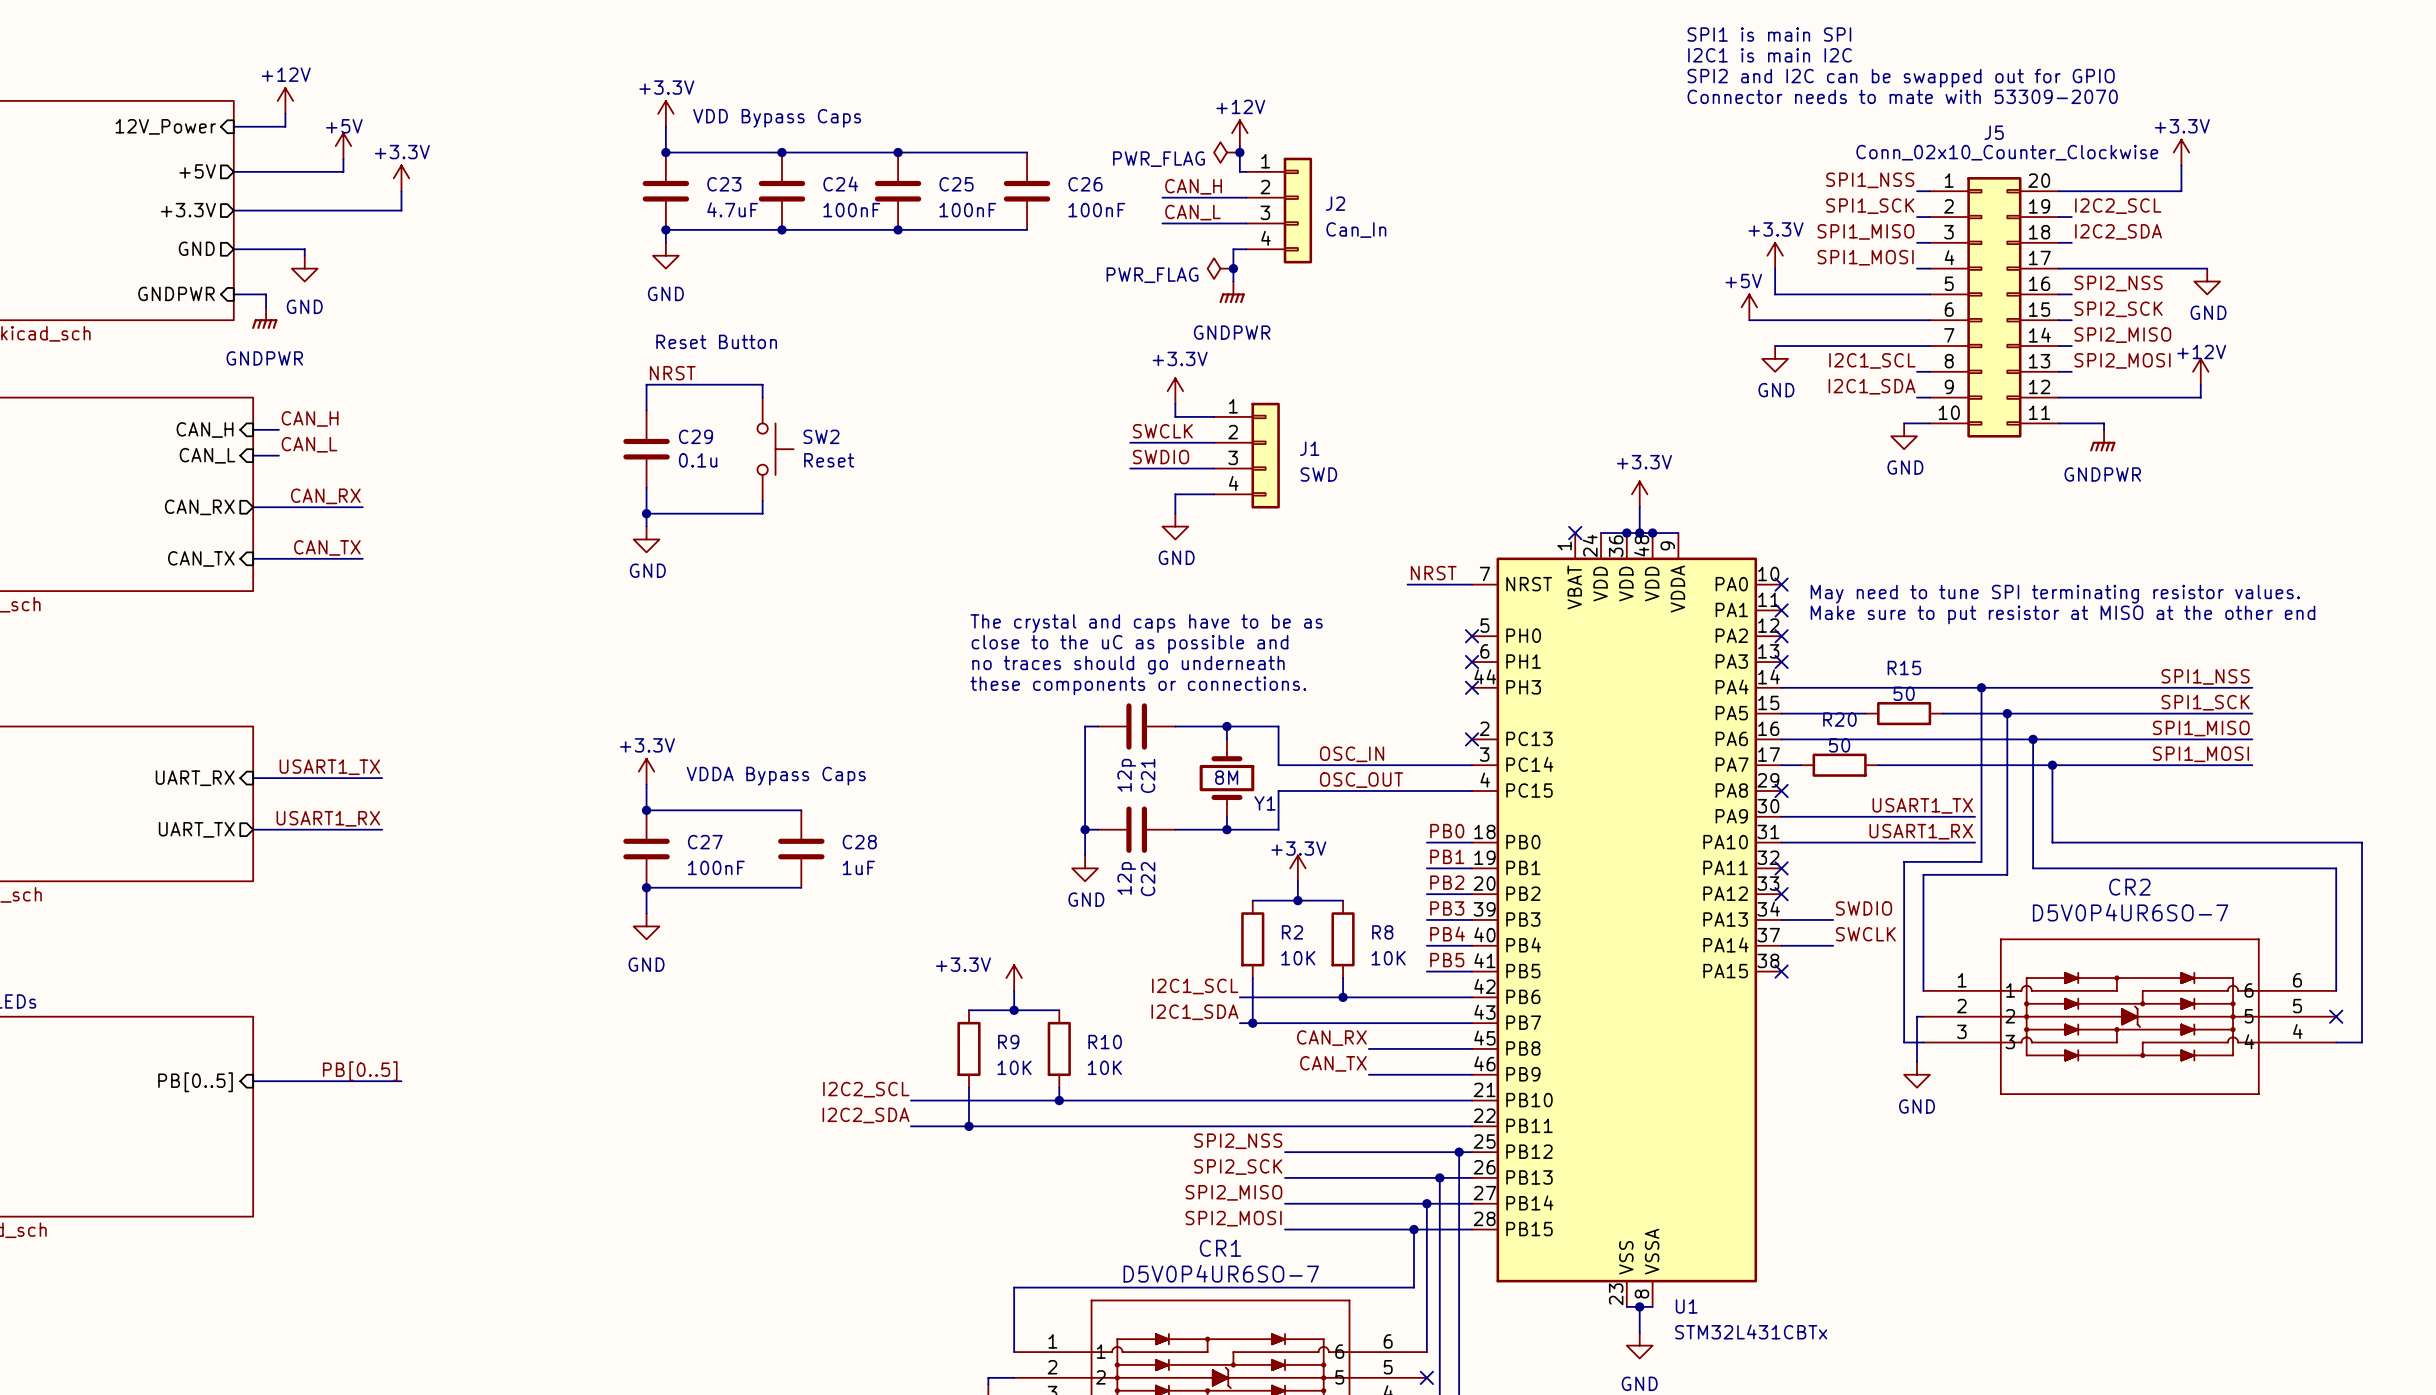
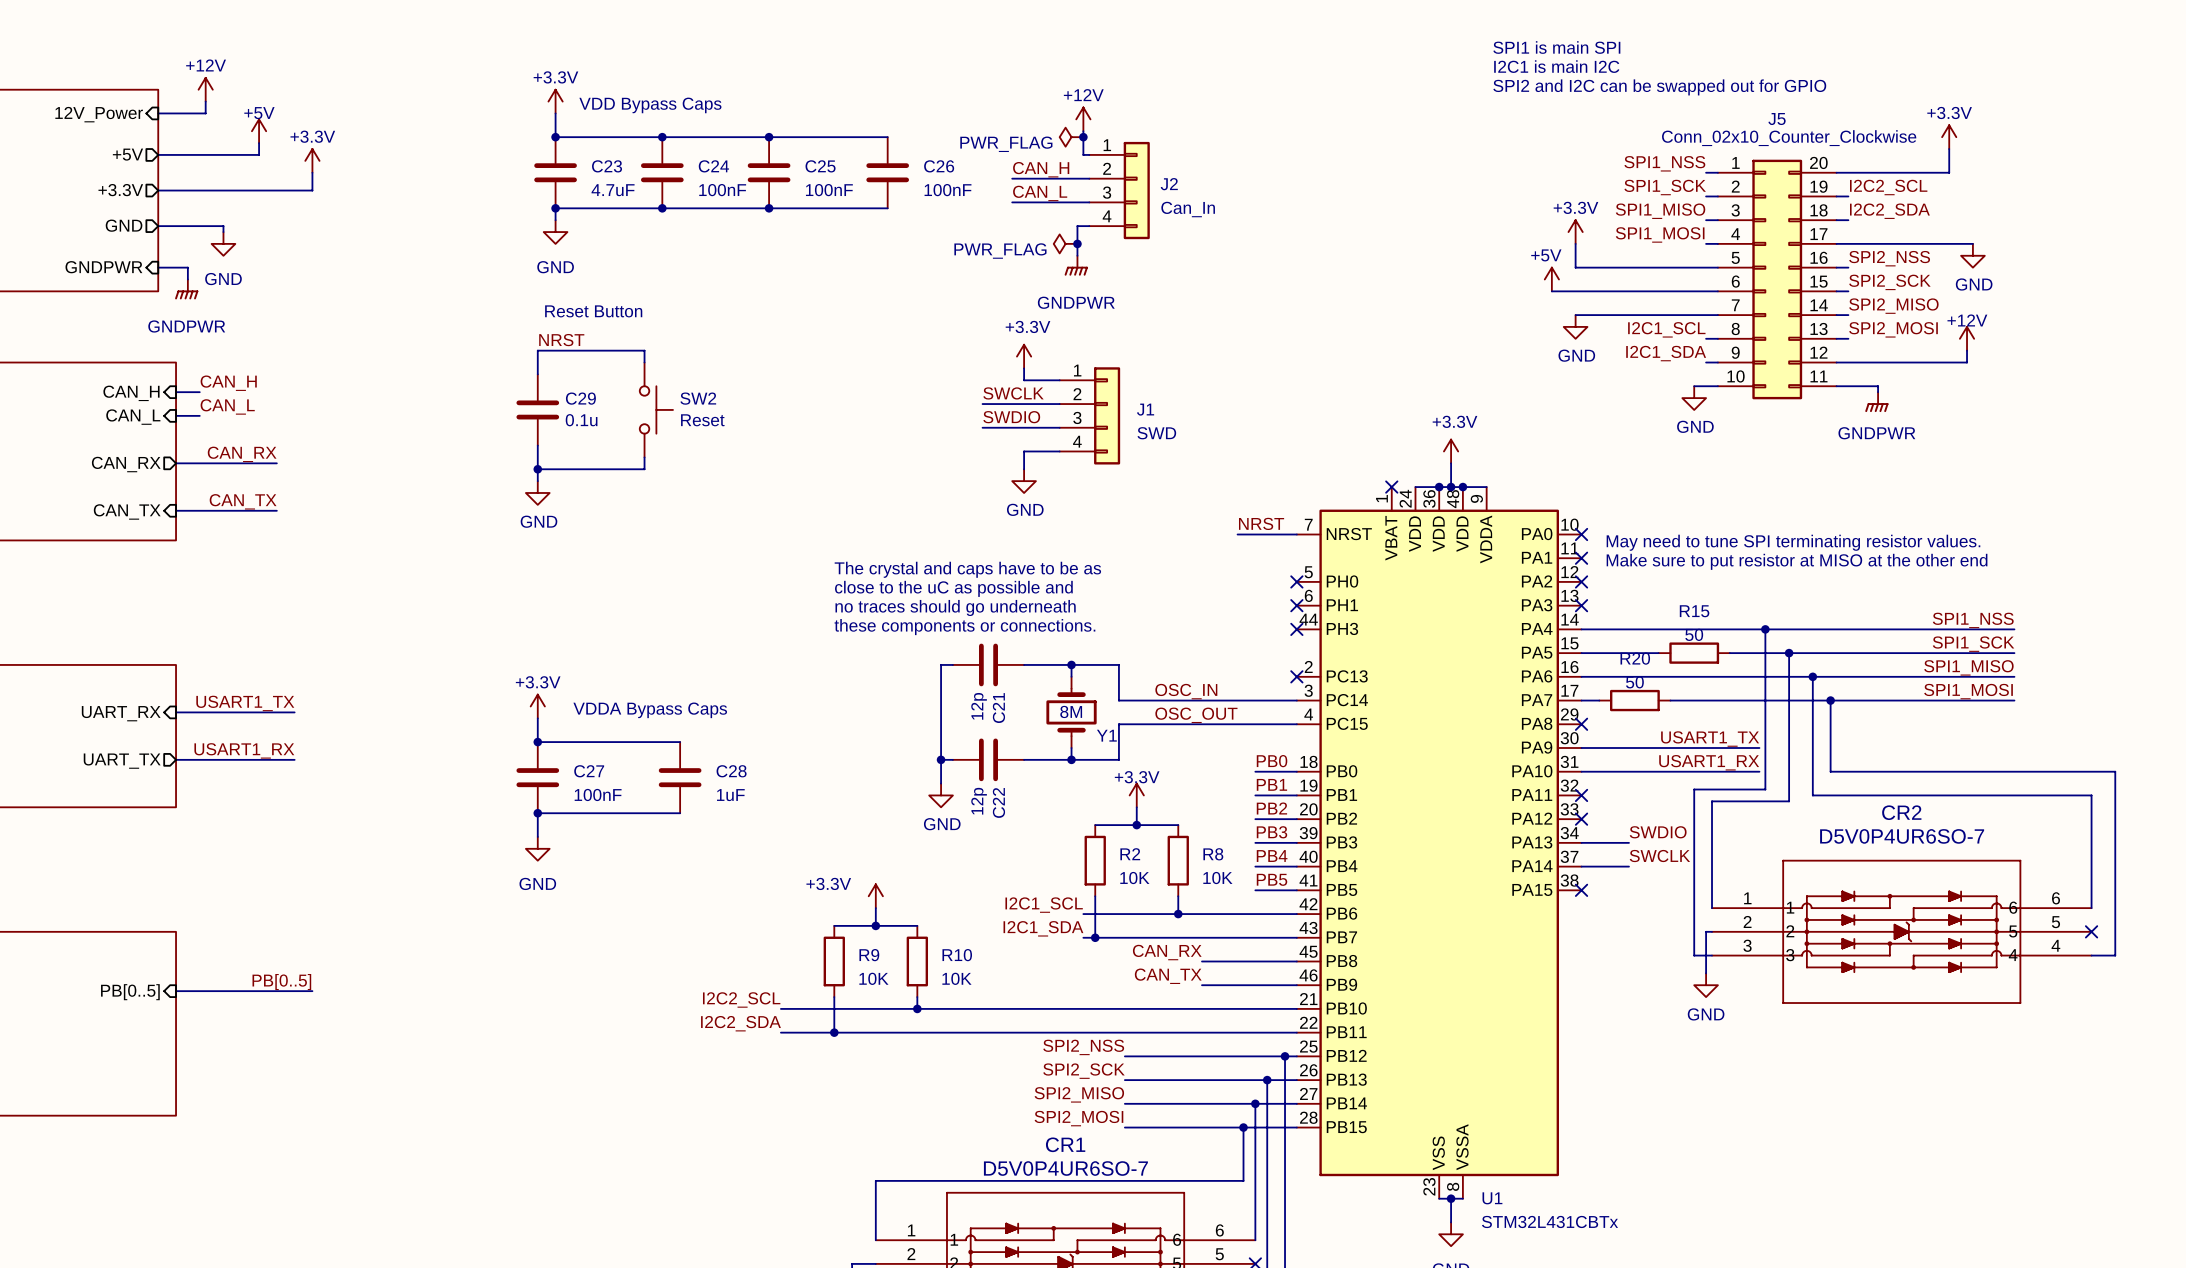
text: SPI1 is main SPI (1769, 34) -> none
text: I2C1 is main I2C (1770, 55) -> SPI1 is main SPI (1556, 47)
text: SPI2 and I2C can be swapped out for GPIO (1901, 78) -> I2C1 is main I2C (1556, 66)
text: Connector needs to mate with 53309-2070 (1902, 96) -> SPI2 and I2C can be swapped out for GPIO (1659, 87)

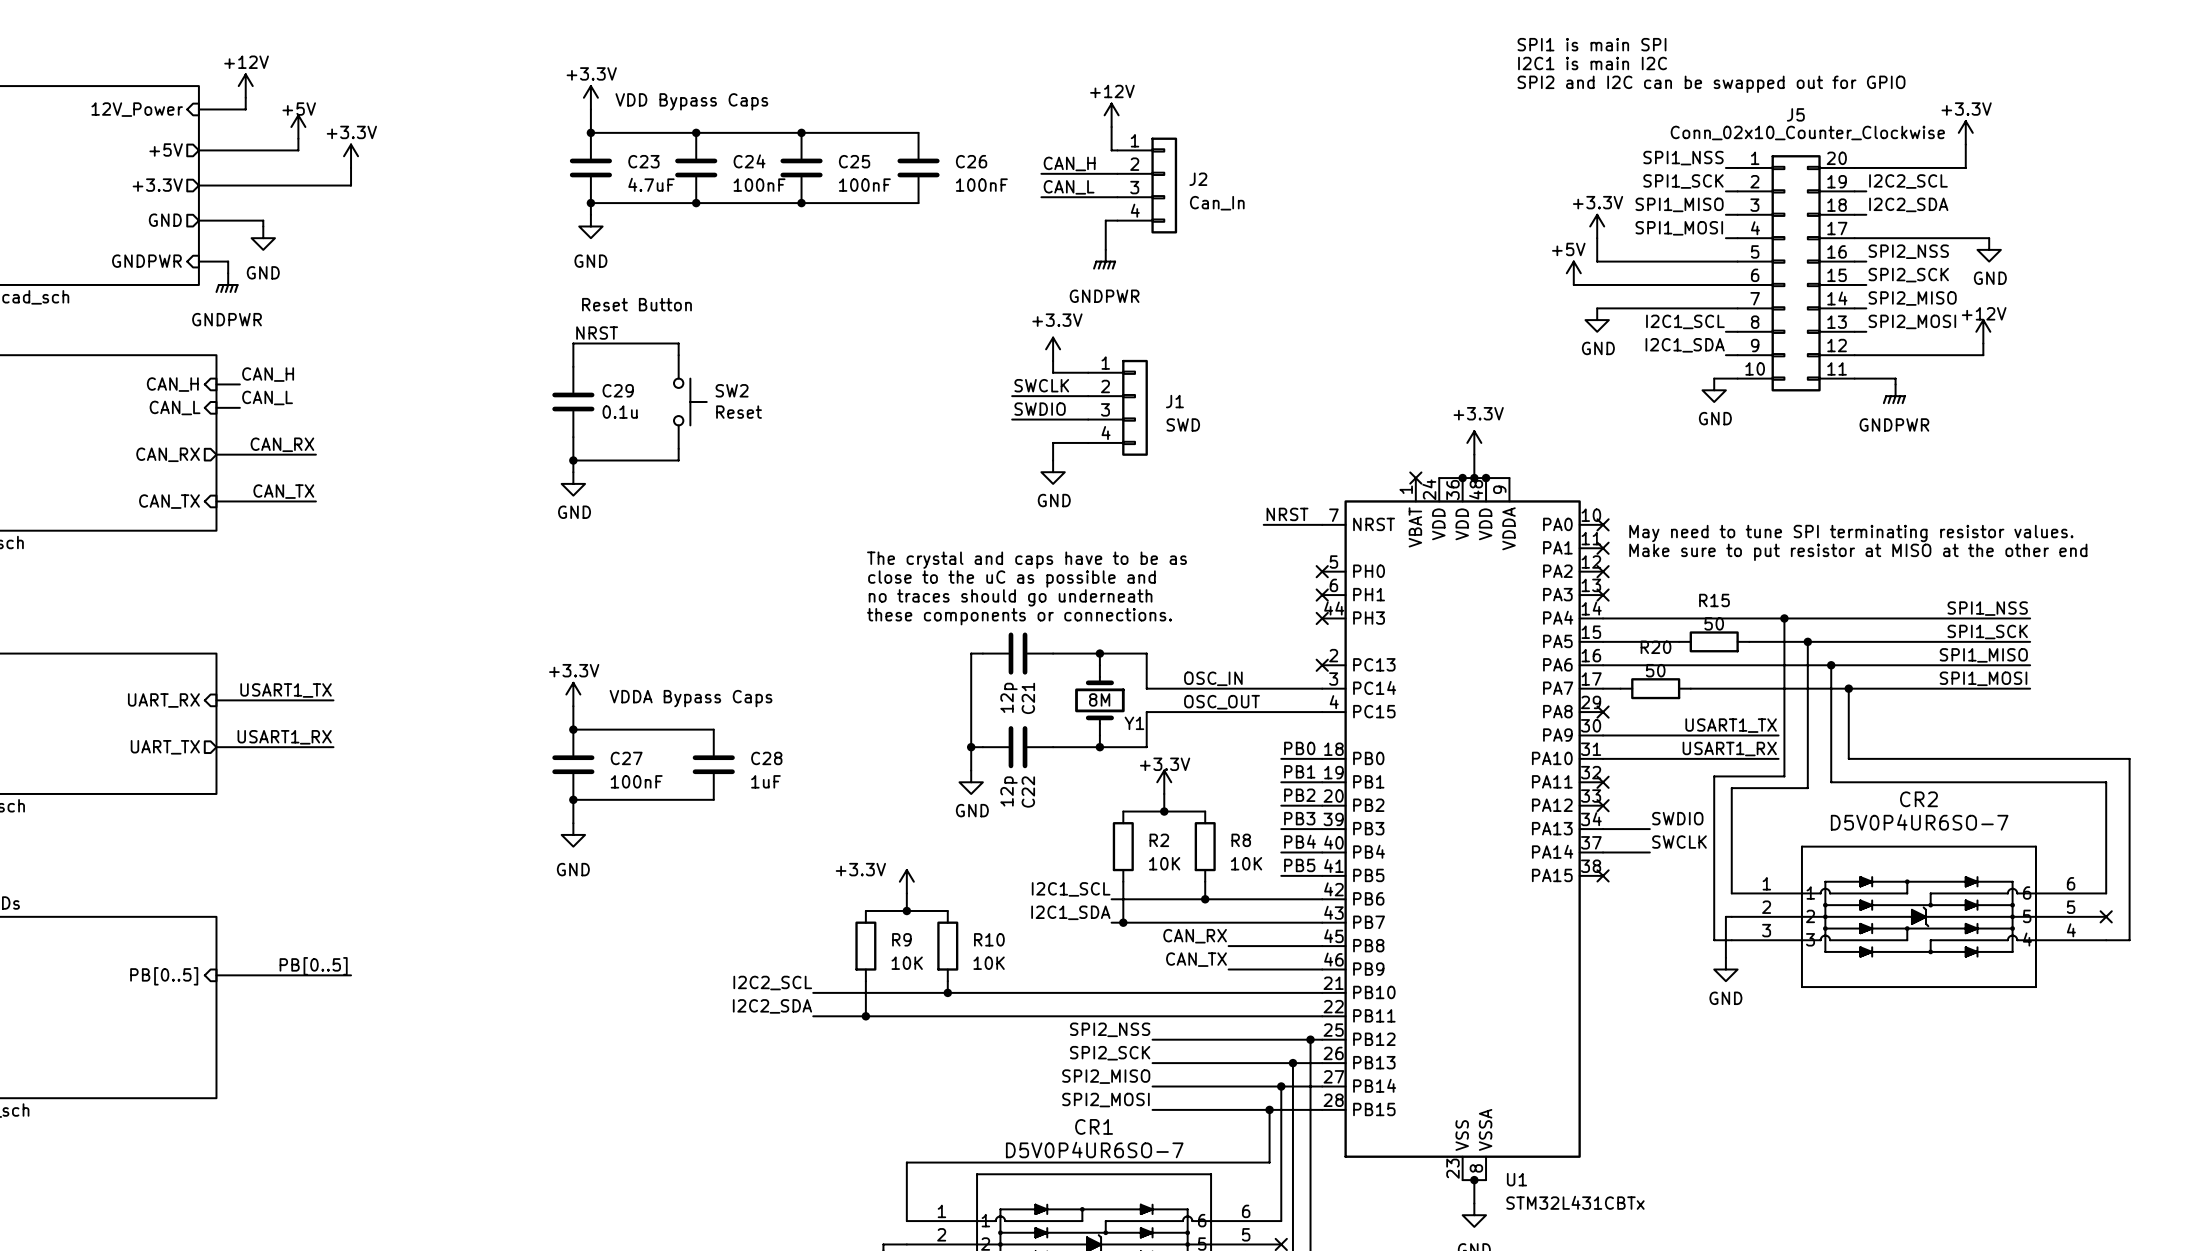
power symbol: PWR_FLAG (1071, 137) -> none
junction: (1083, 137) -> none
power symbol: PWR_FLAG (1065, 243) -> none
junction: (1077, 243) -> none

